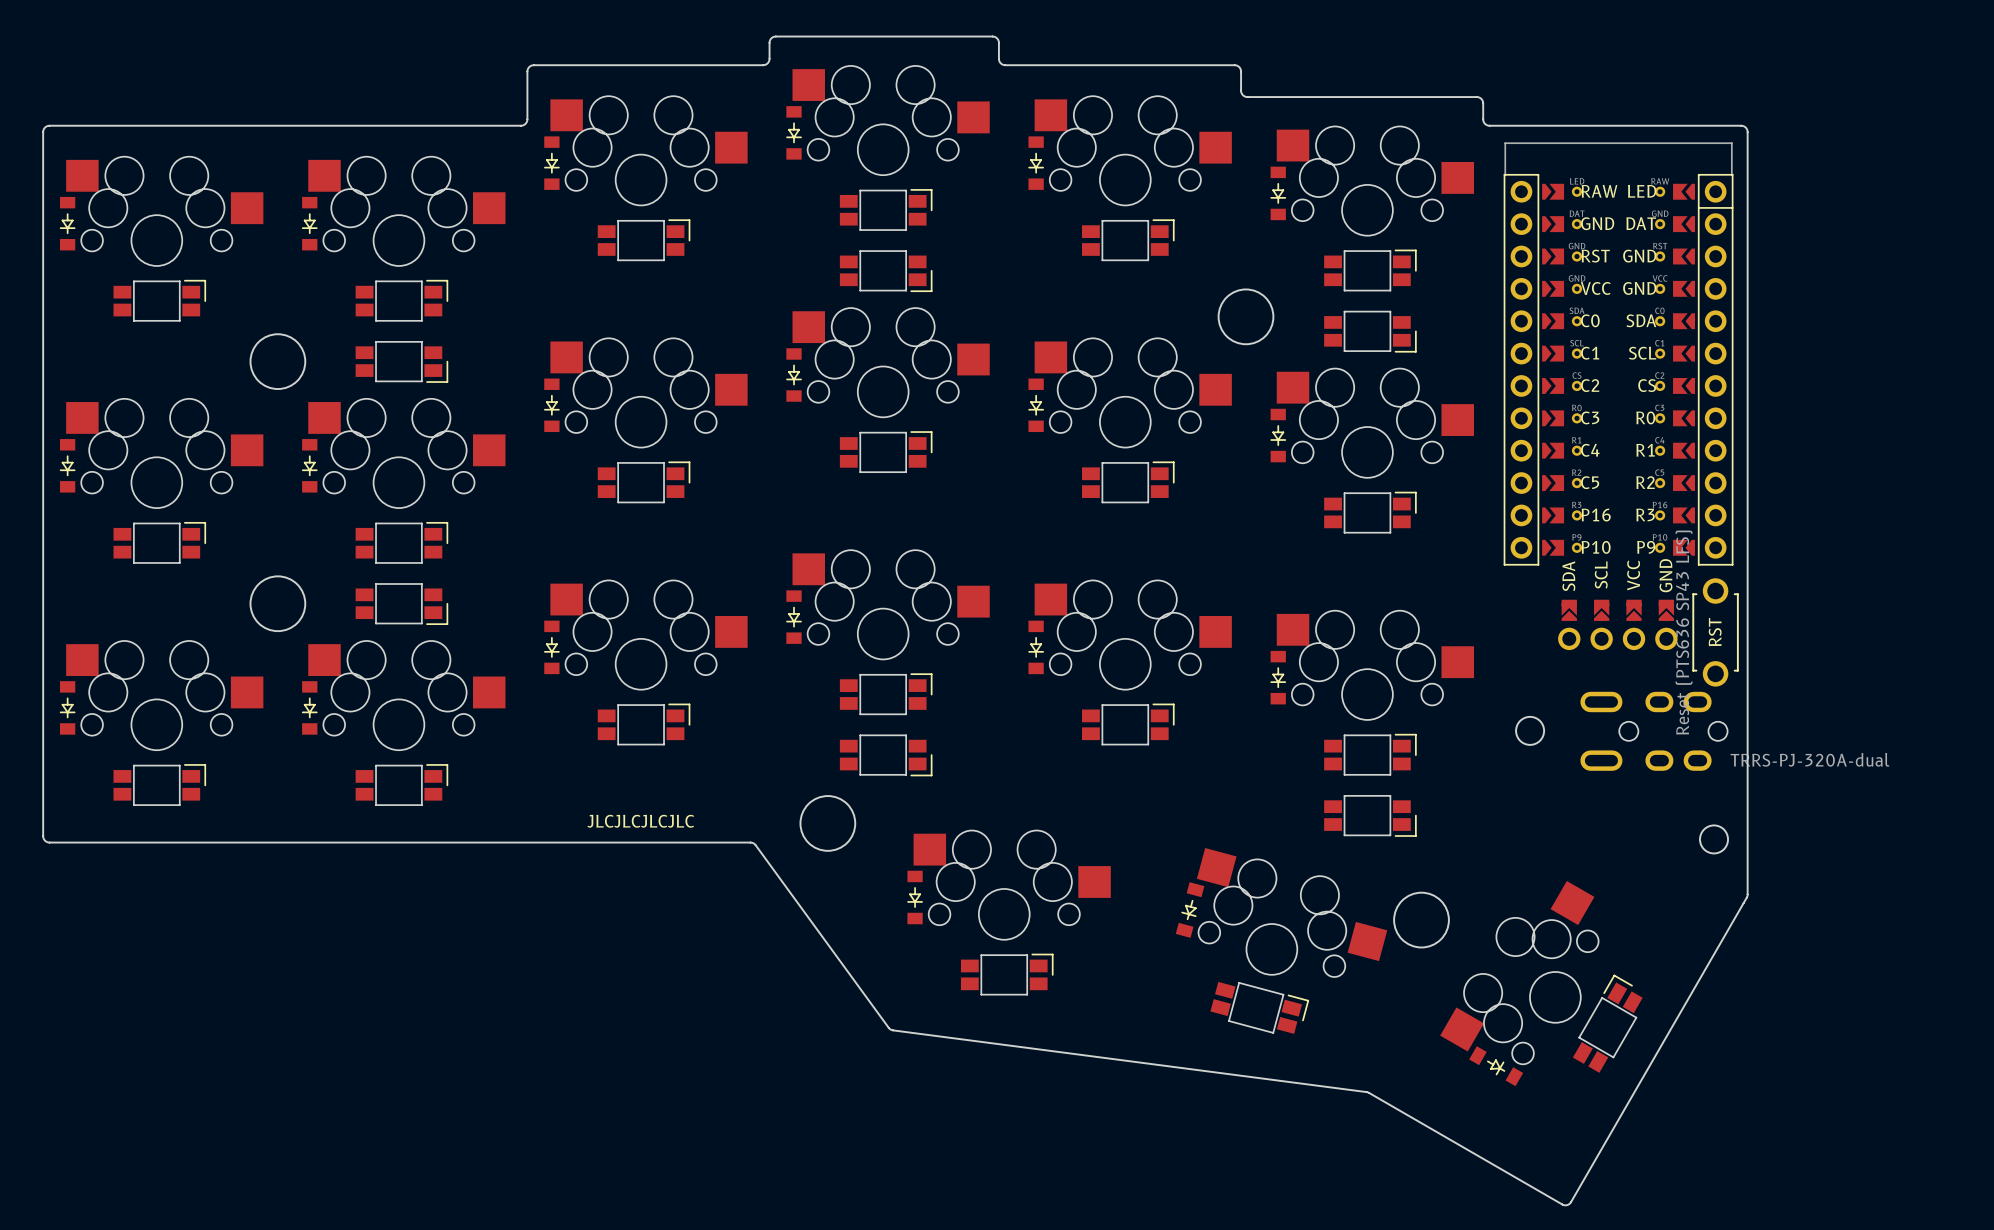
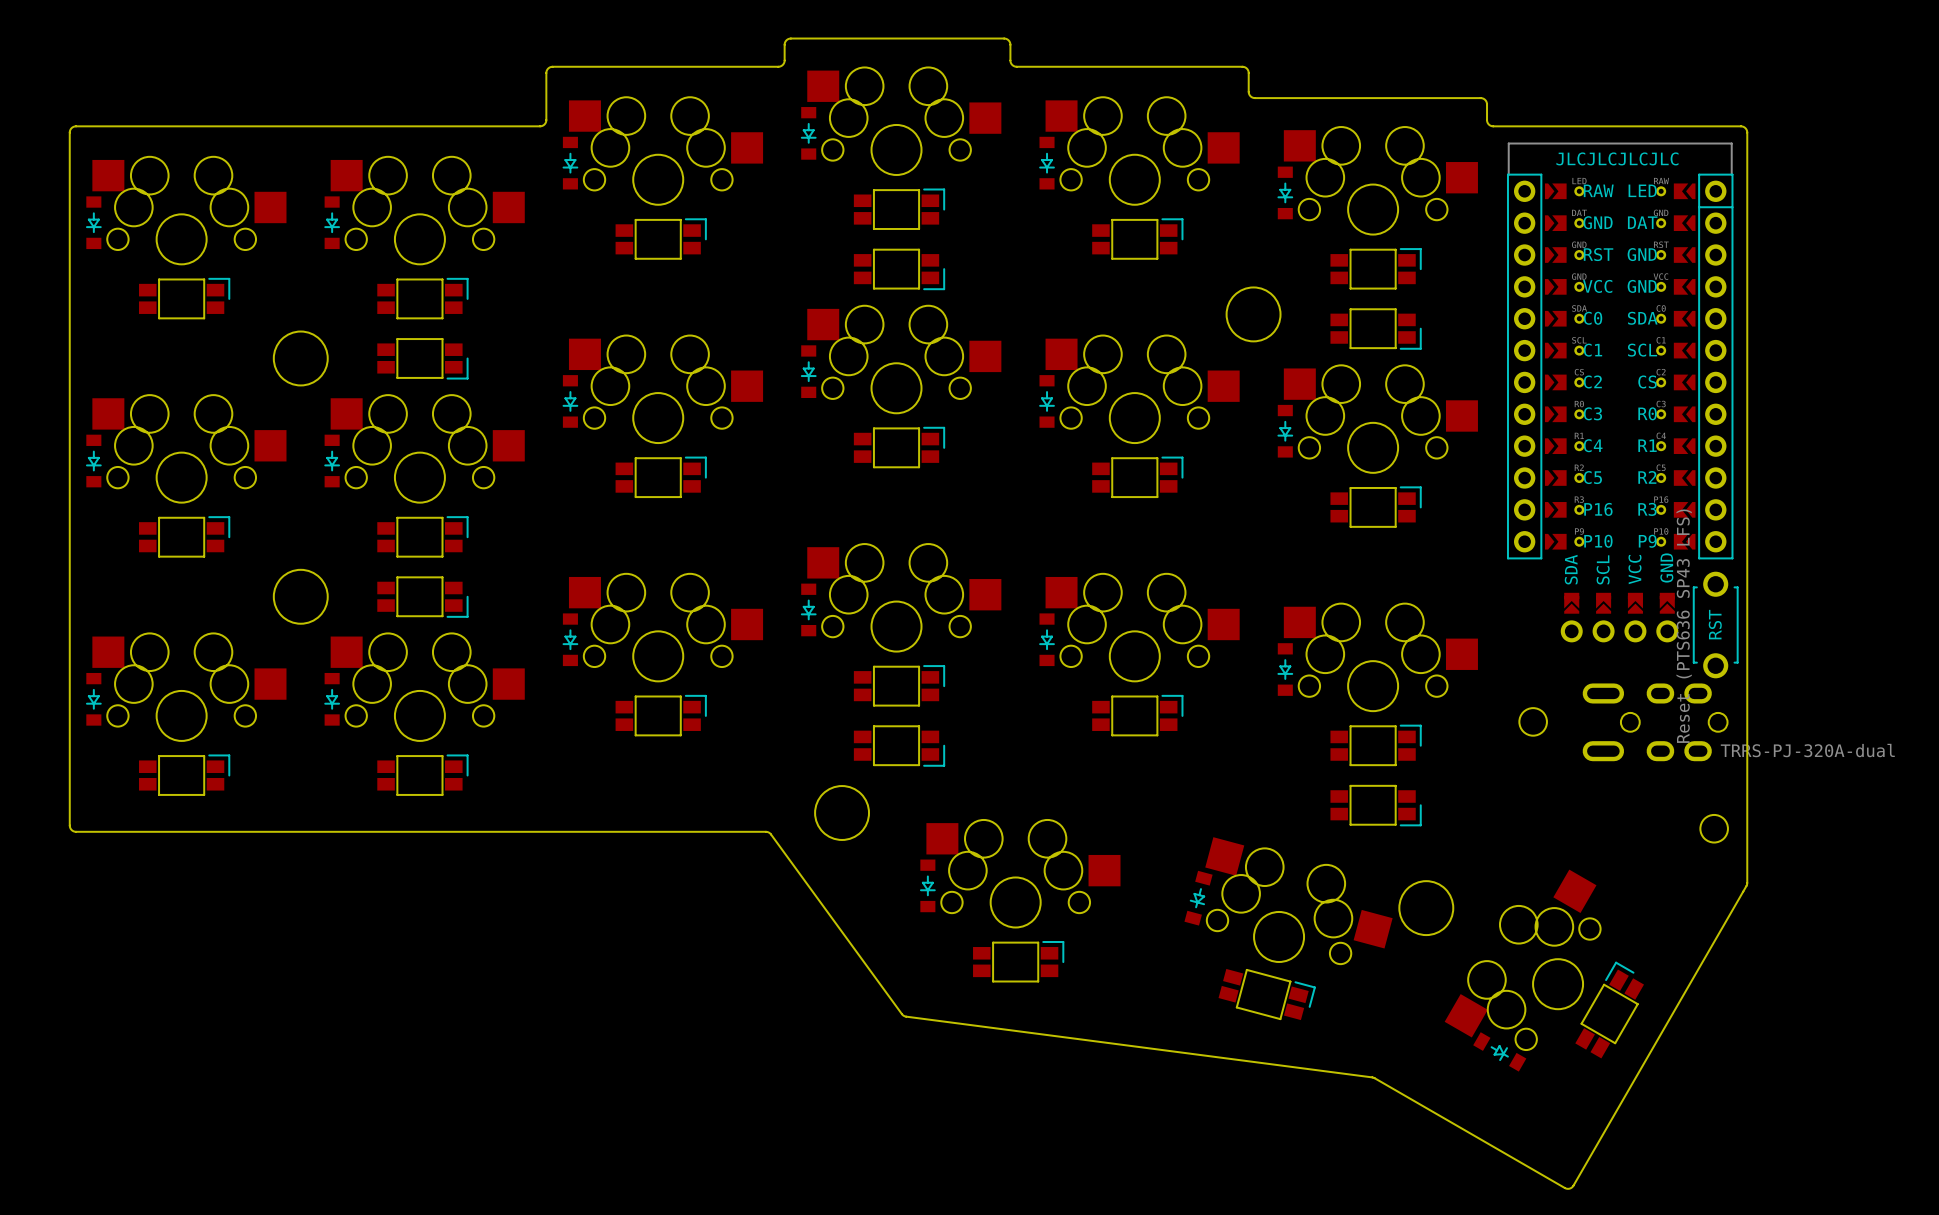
text: none -> JLCJLCJLCJLC (1617, 158)
text: JLCJLCJLCJLC (640, 821) -> none

